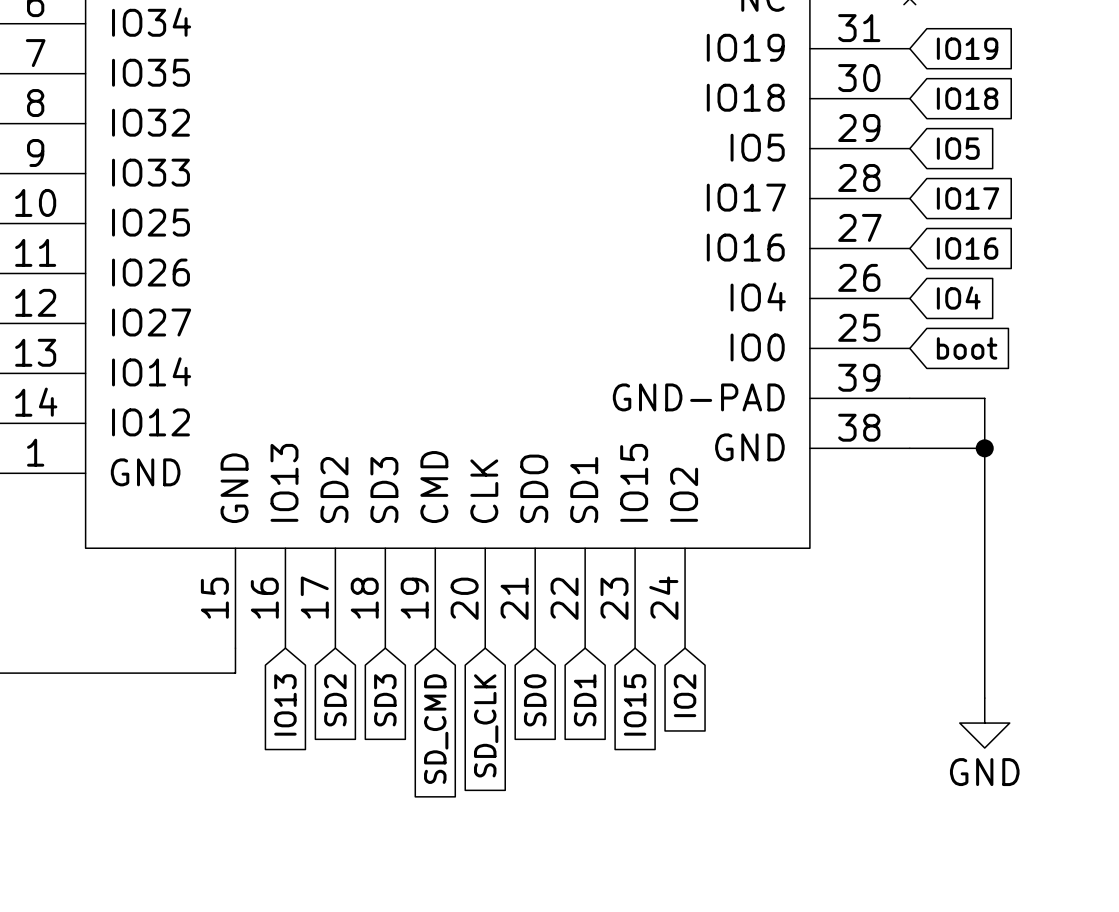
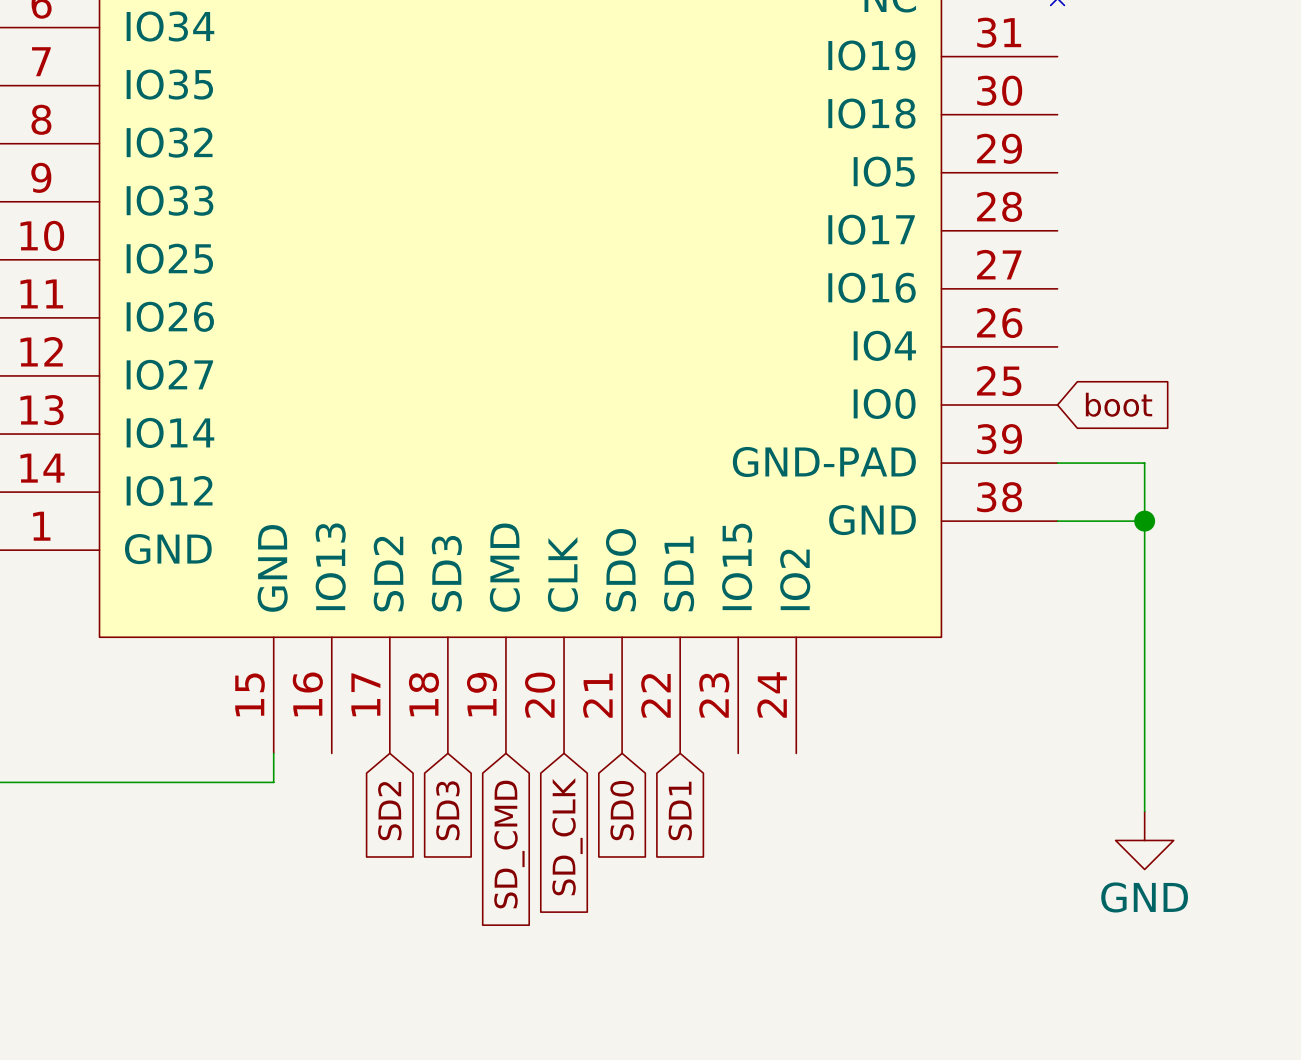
global label: IO19 (967, 48) -> none
global label: IO18 (967, 98) -> none
global label: IO5 (958, 148) -> none
global label: IO17 (968, 198) -> none
global label: IO16 (967, 248) -> none
global label: IO4 (958, 298) -> none
global label: IO2 (685, 695) -> none
global label: IO13 (285, 704) -> none
global label: IO15 (635, 704) -> none

